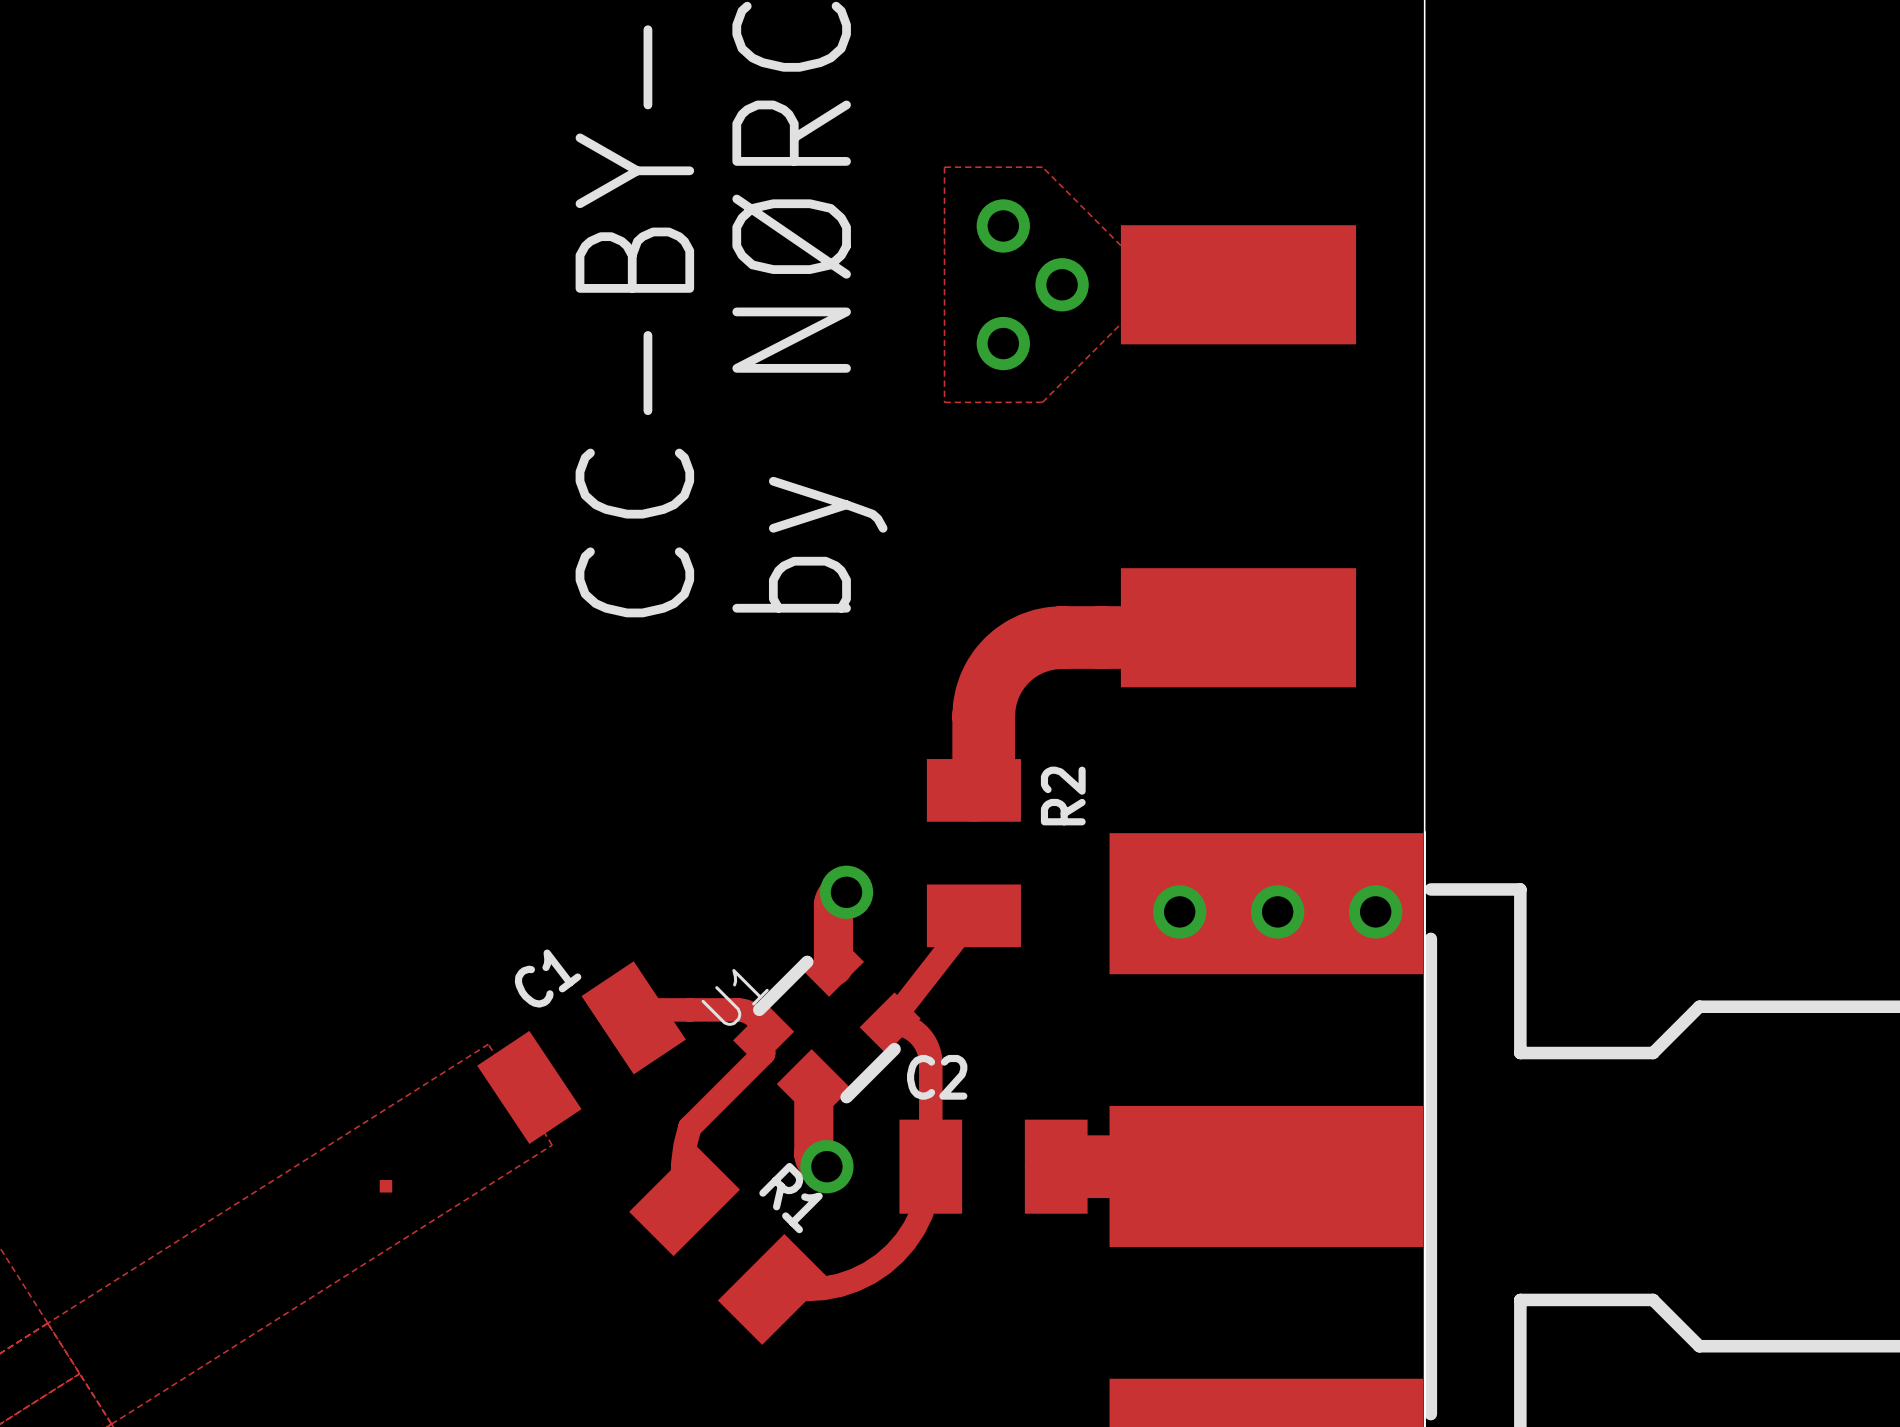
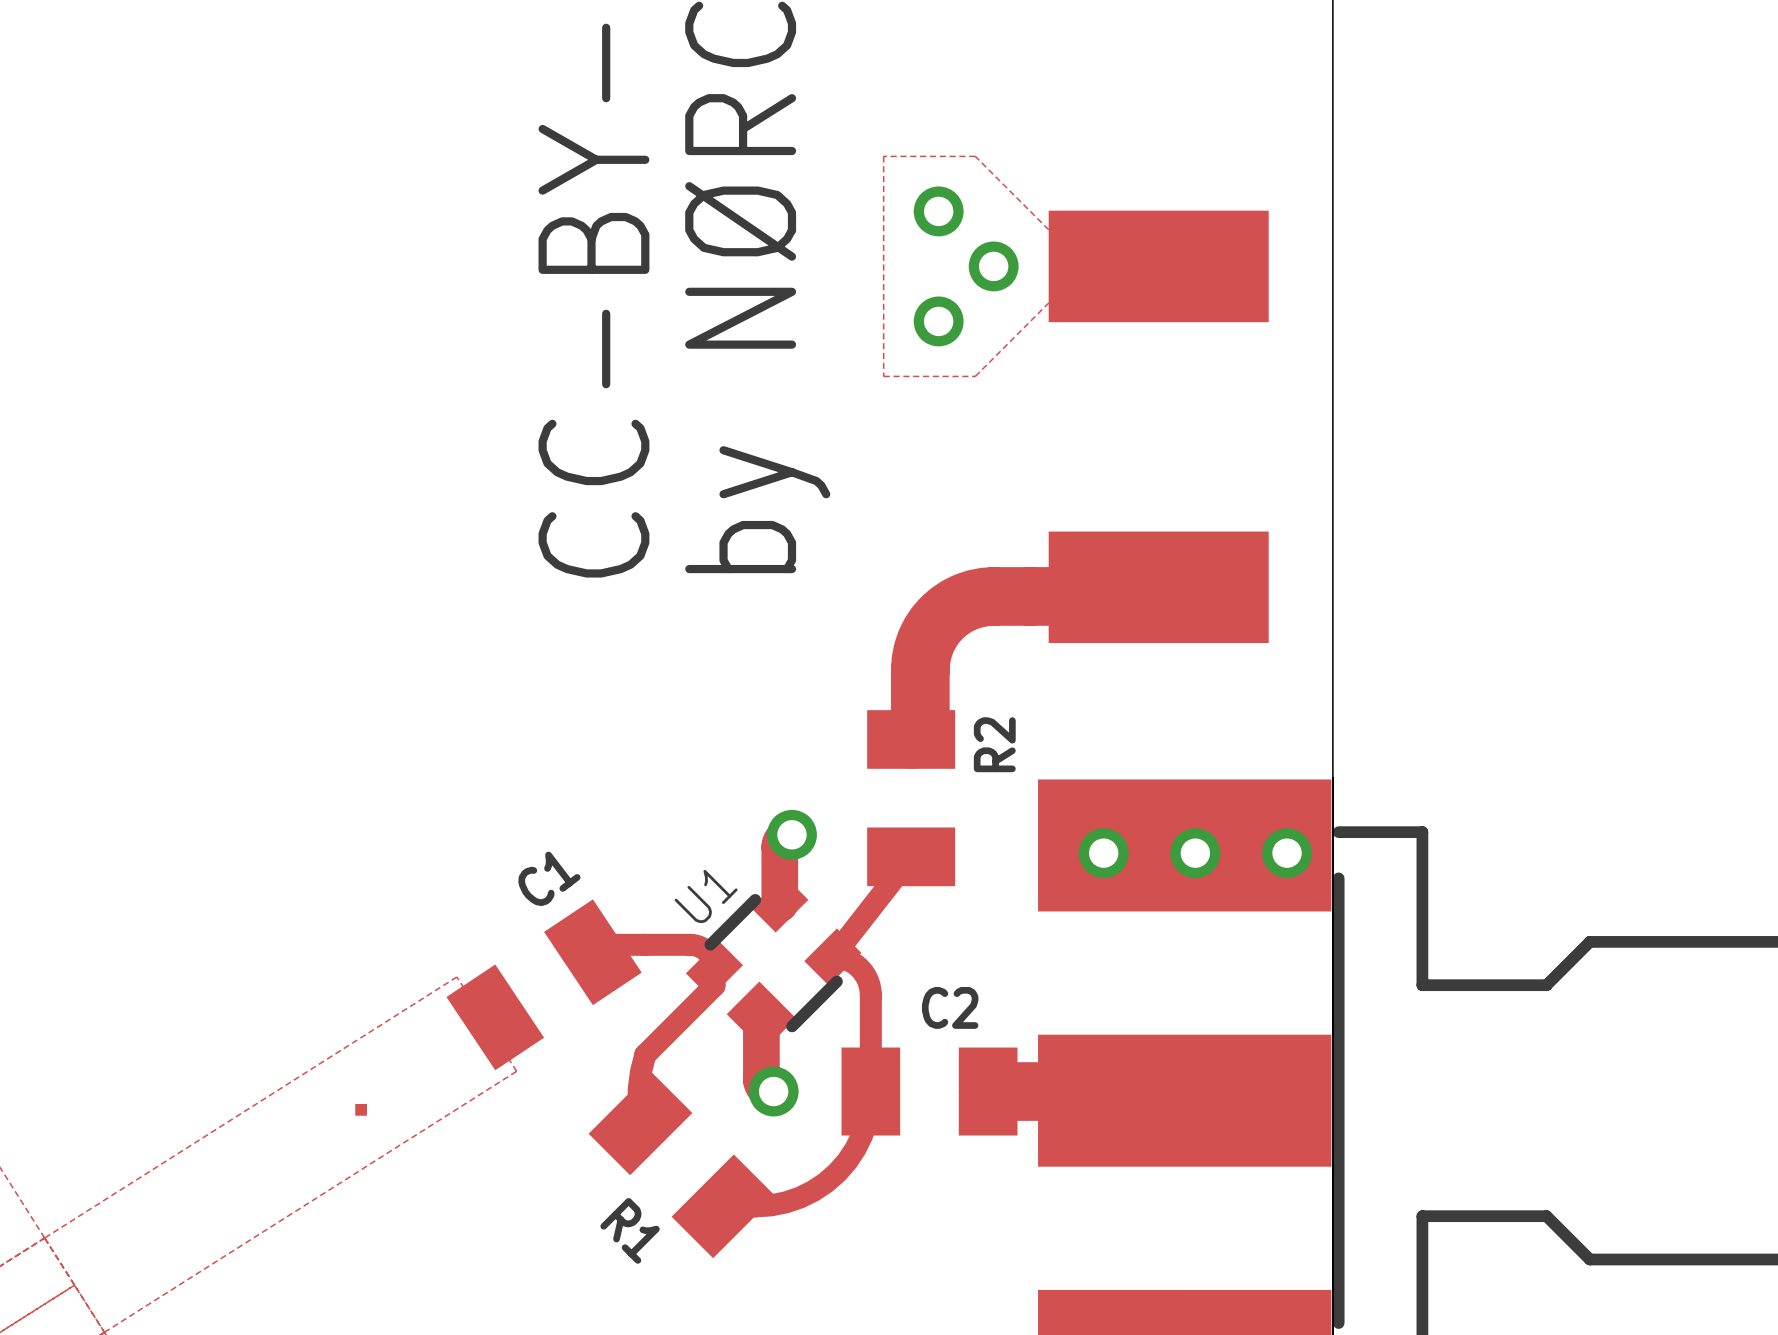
C1 name position: C1 (548, 978) -> C1 (549, 878)
U1 name position: U1 (735, 997) -> U1 (706, 896)
C2 name position: C2 (937, 1077) -> C2 (950, 1007)
R1 name position: R1 (791, 1198) -> R1 (630, 1230)

